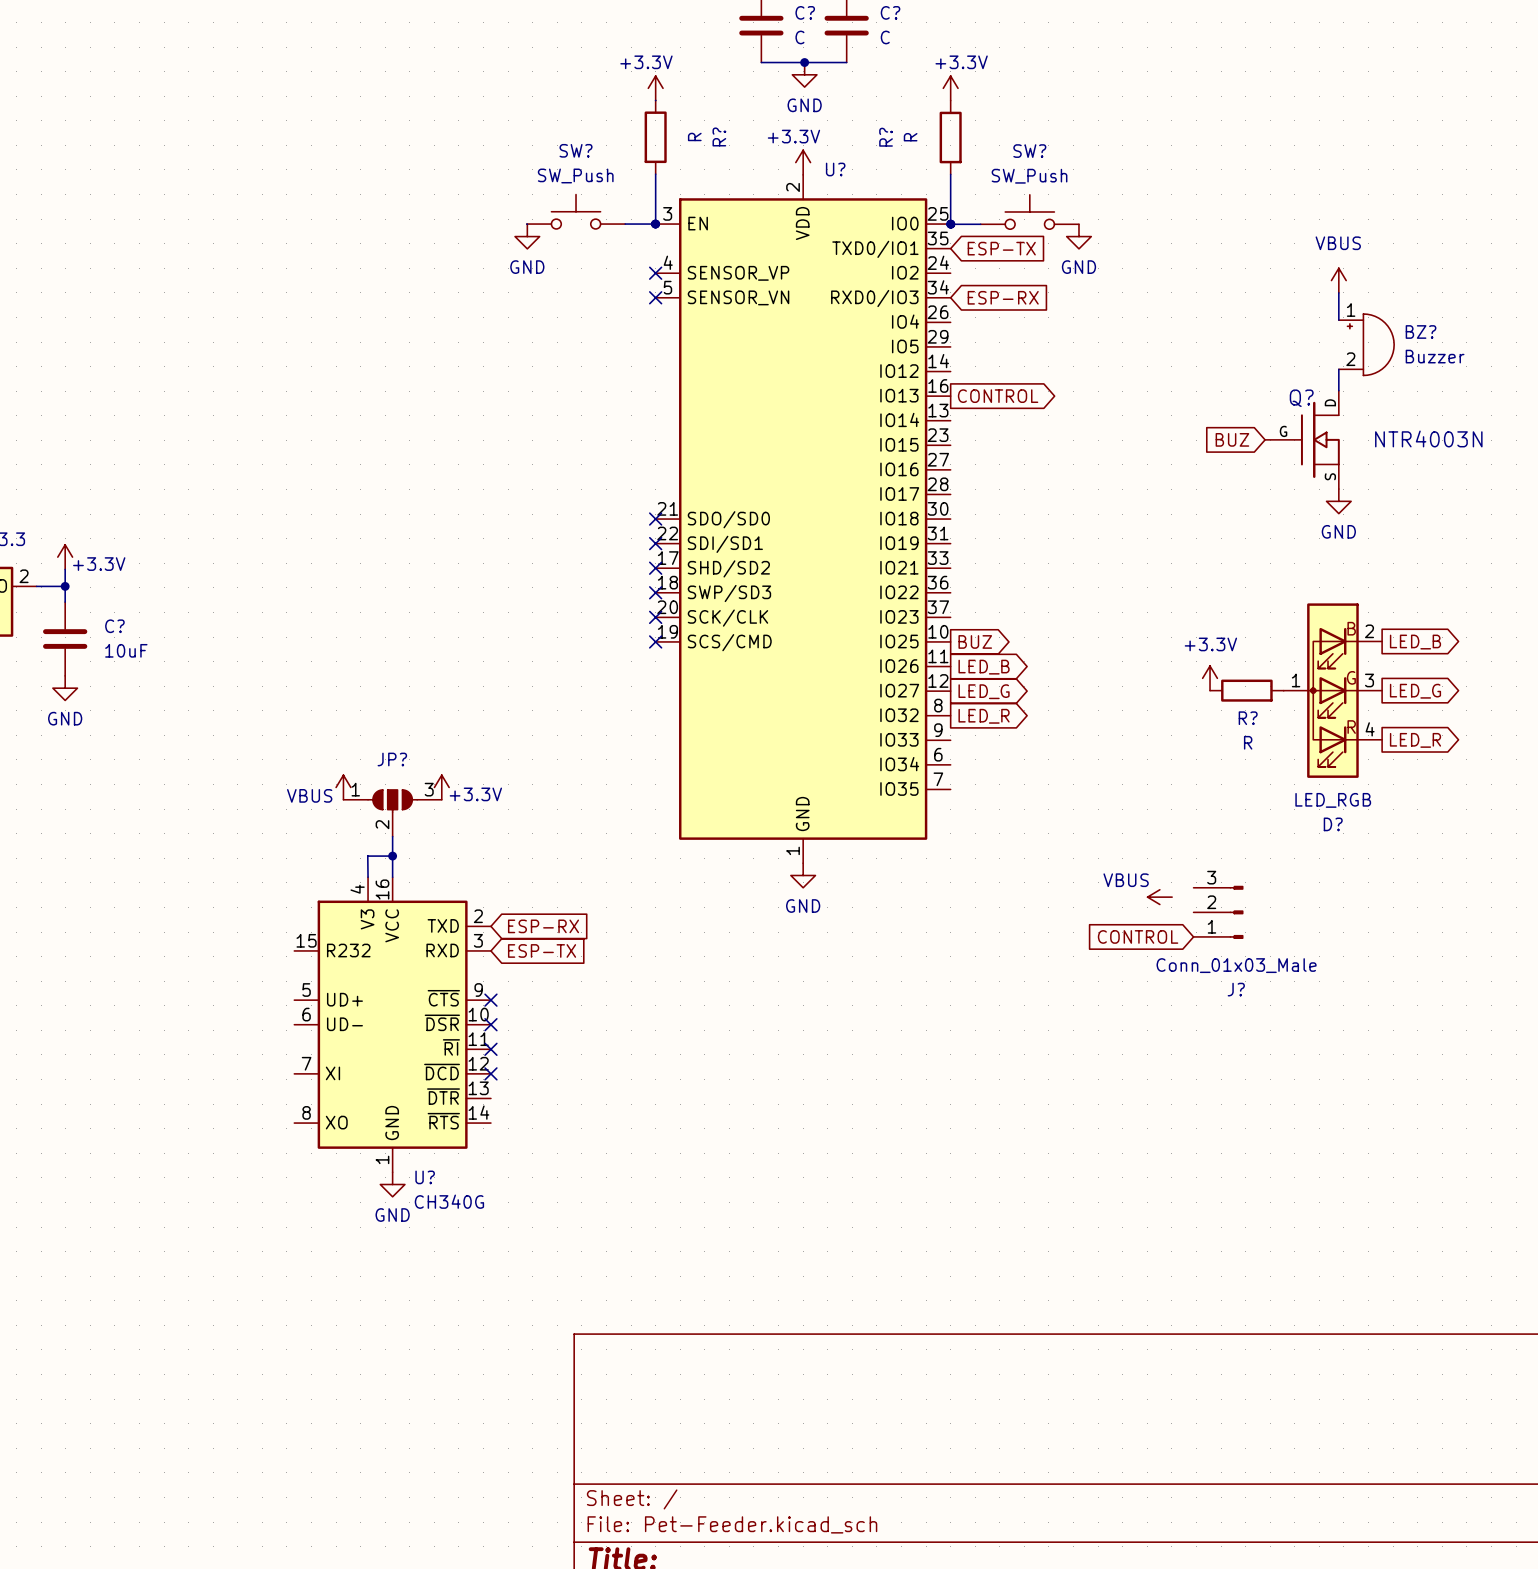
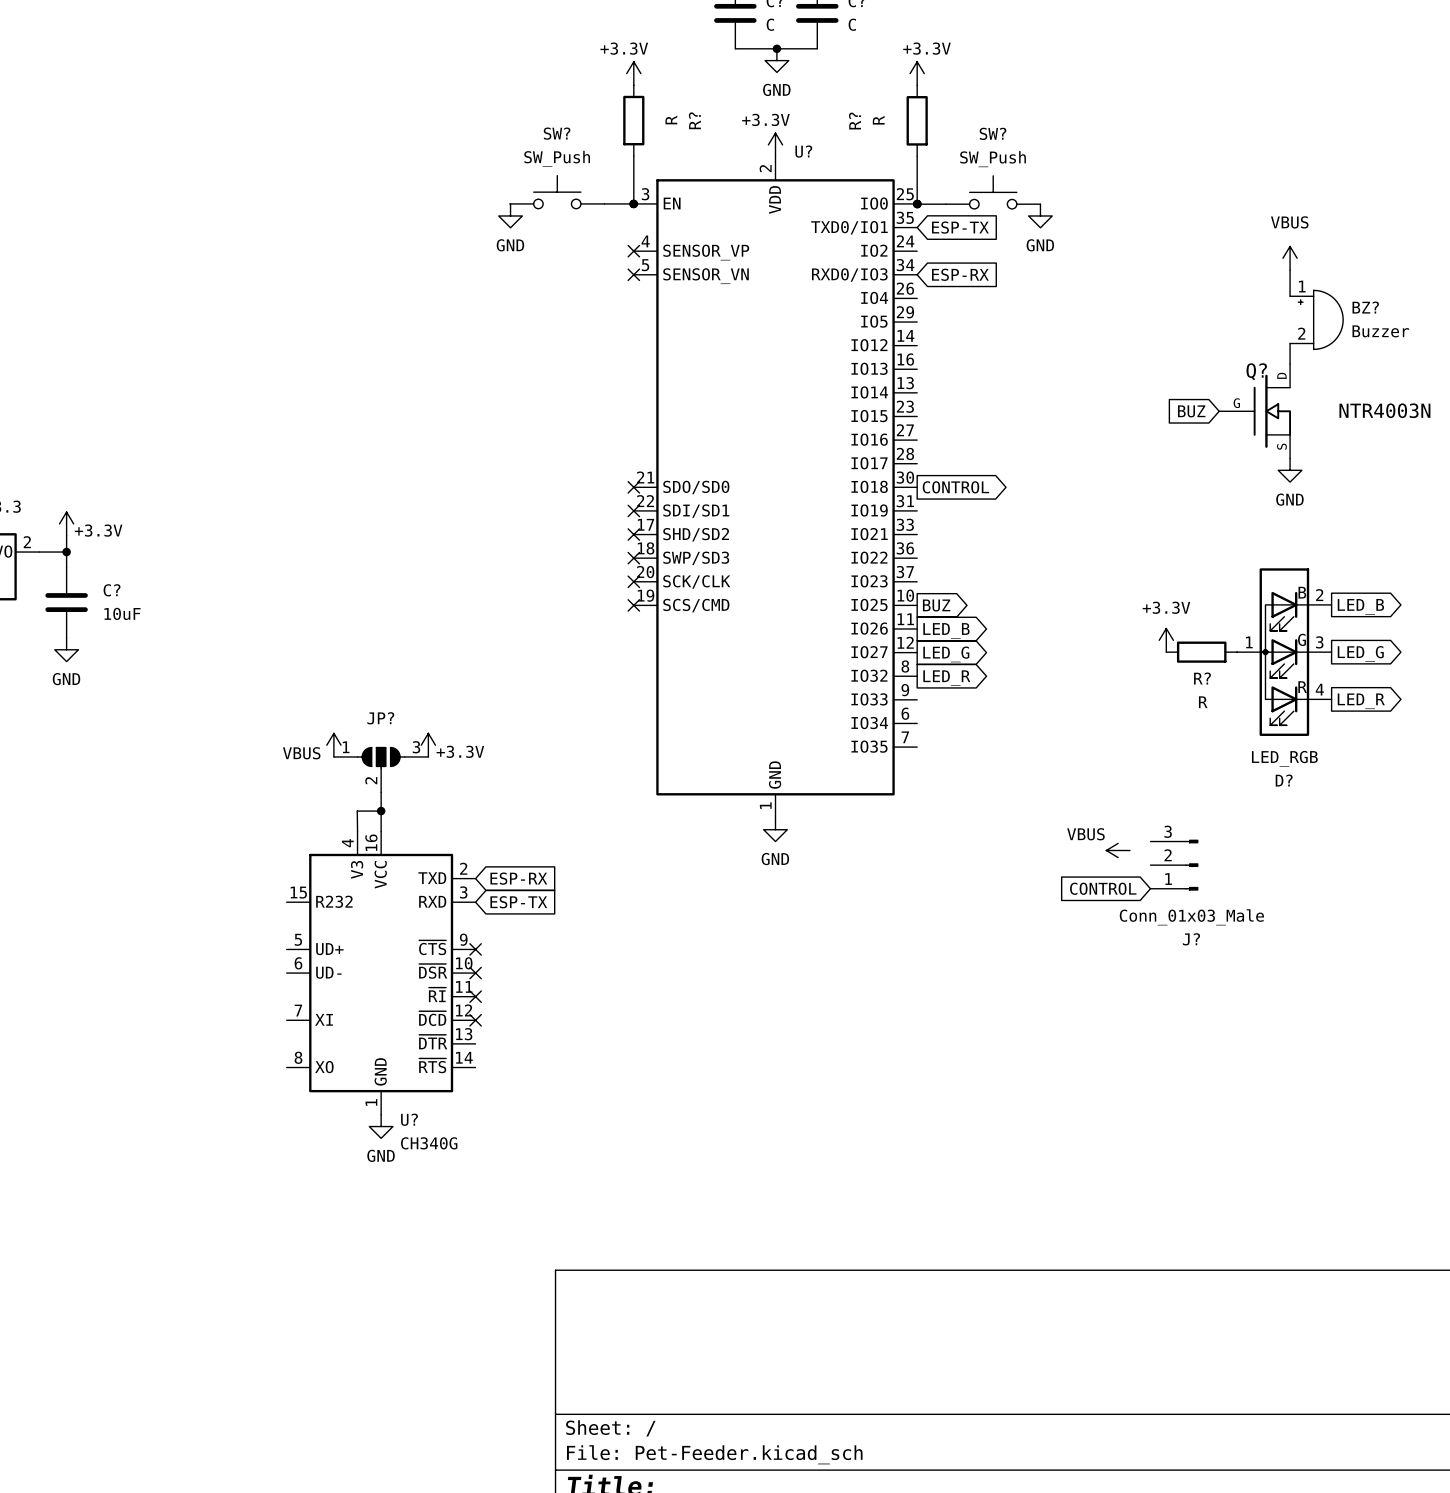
global label position: CONTROL (998, 396) -> CONTROL (955, 487)

